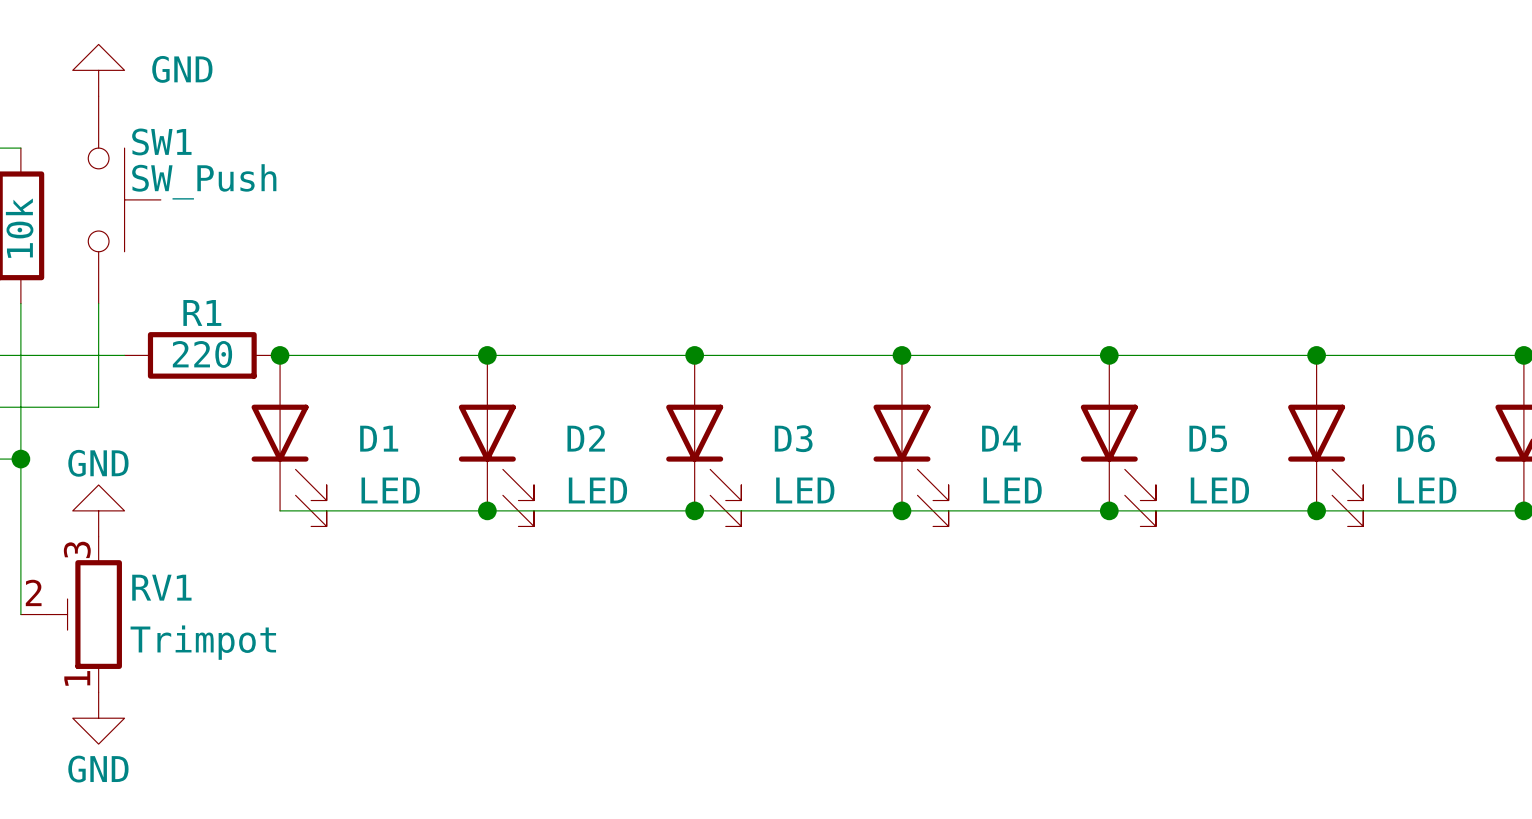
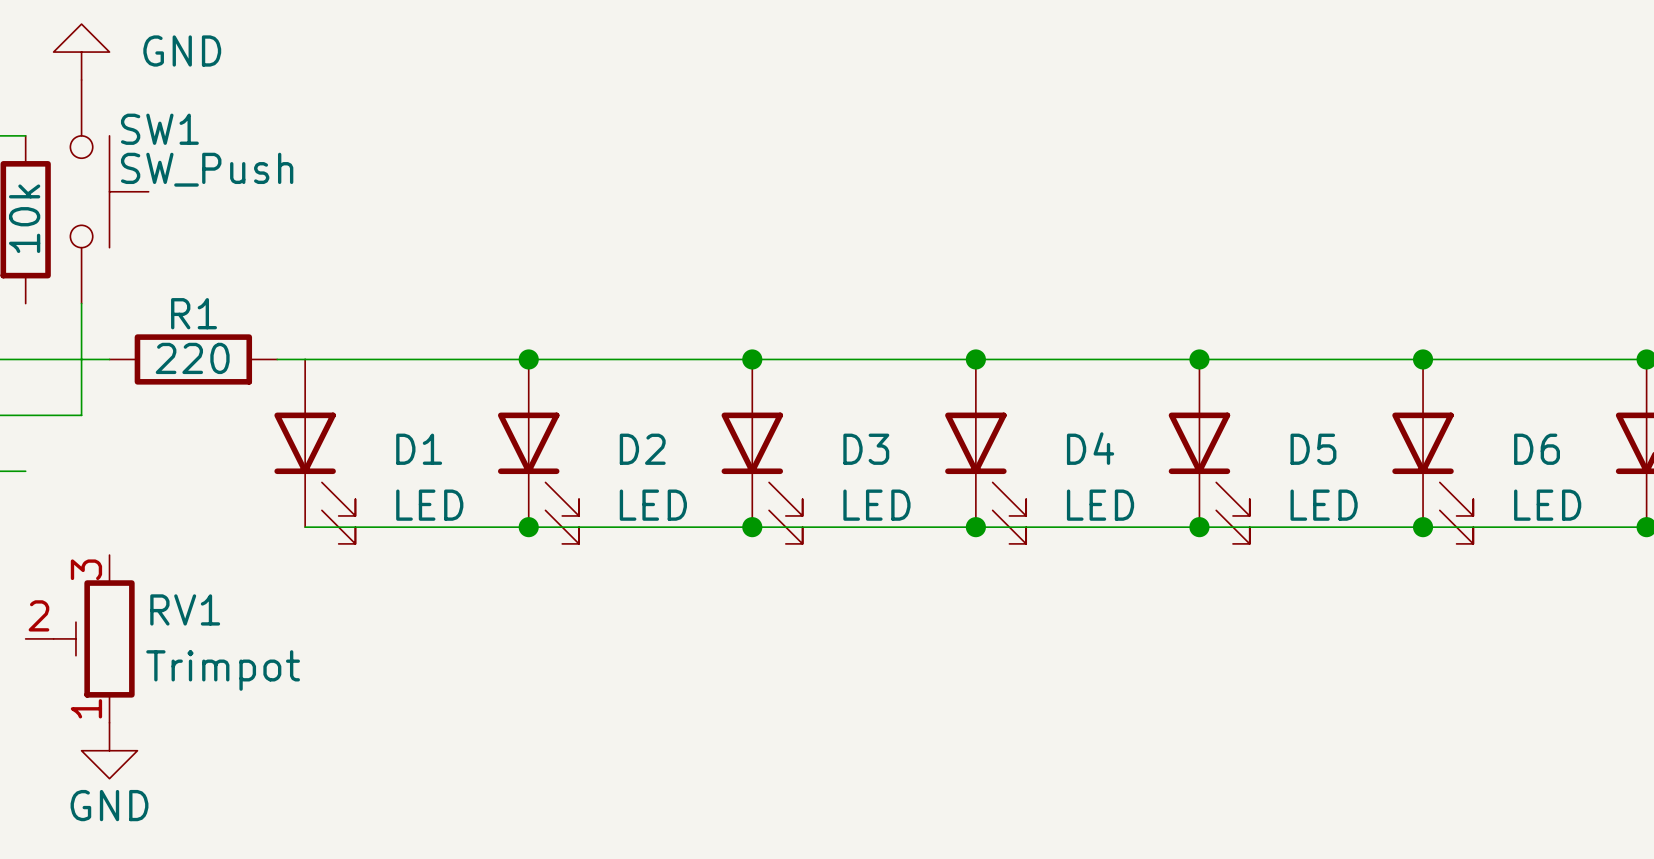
power symbol position: GND (98, 70) -> GND (81, 52)
SW1 position: (124, 199) -> (109, 191)
wire: (20, 303) (20, 614) -> none
wire: (98, 303) (98, 407) (72, 407) -> (81, 303) (81, 415)
R1 position: (202, 355) -> (193, 359)
junction: (280, 355) -> none
junction: (20, 459) -> none
power symbol: GND (98, 510) -> none

